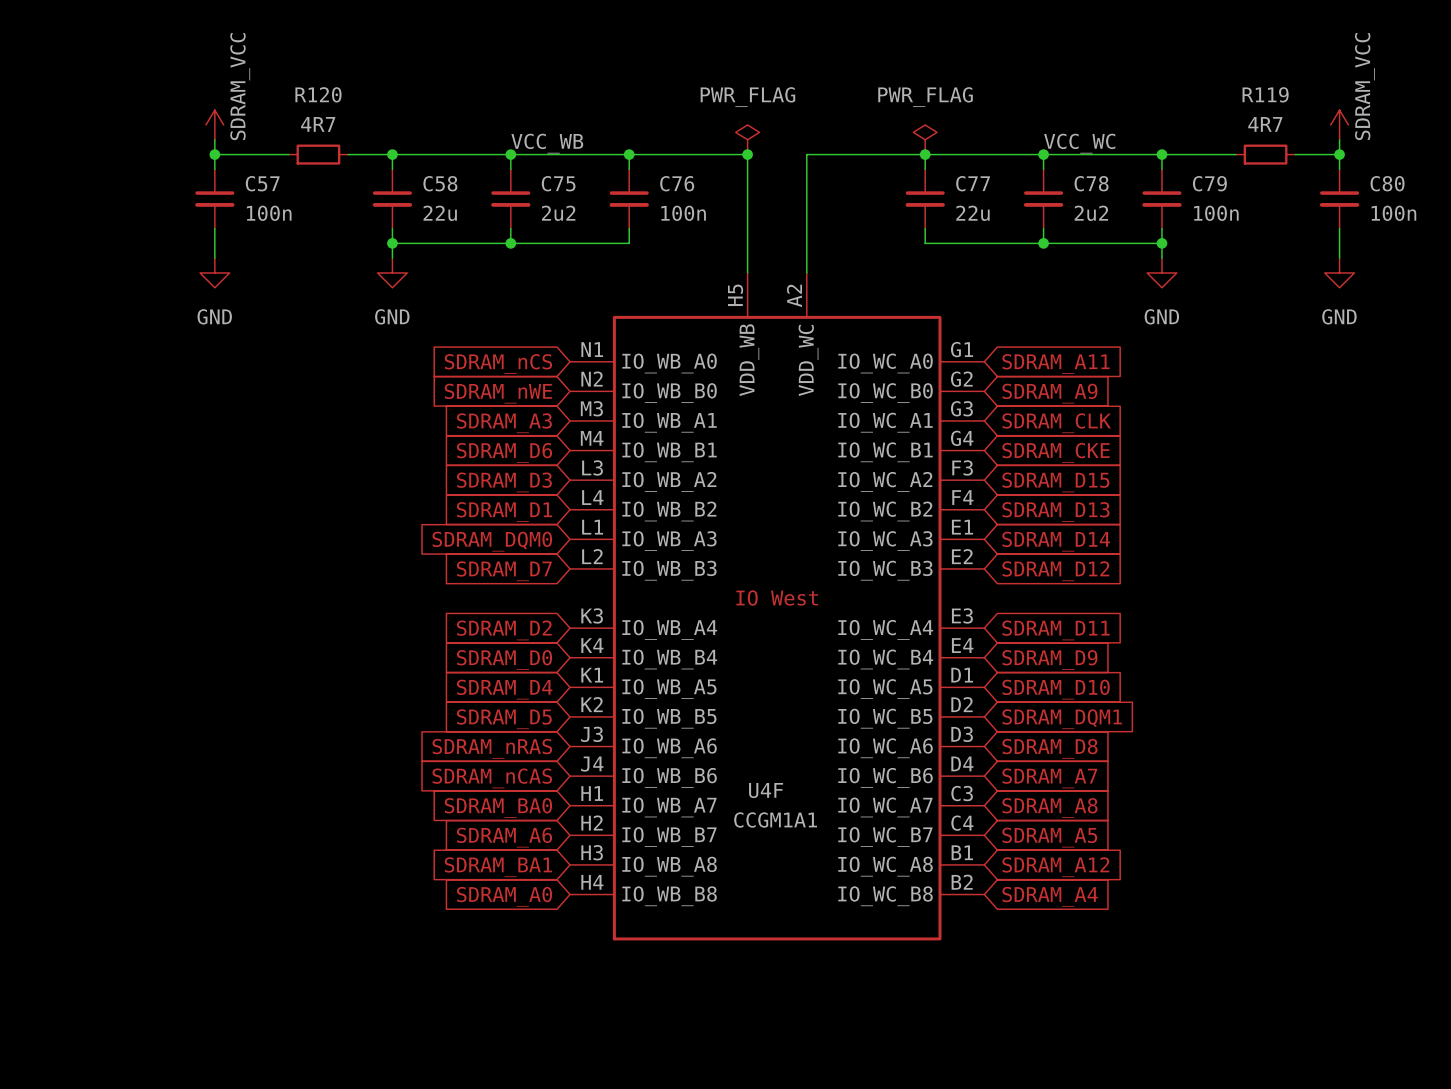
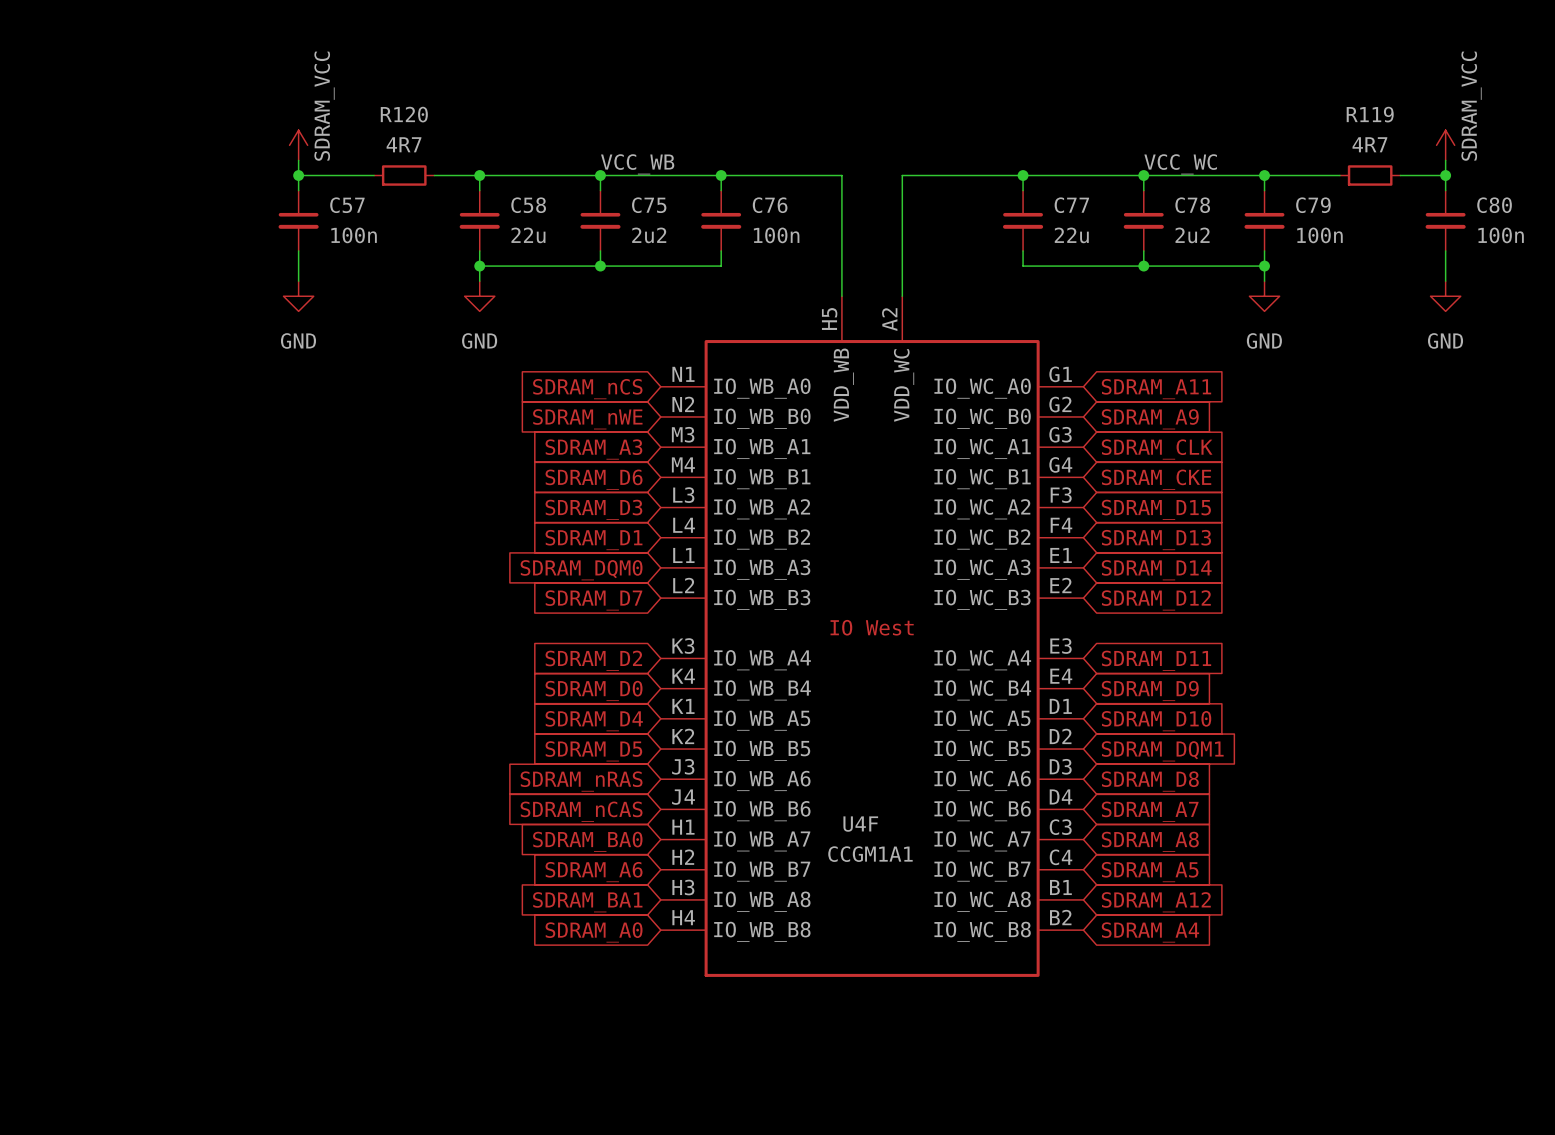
power symbol: PWR_FLAG (747, 139) -> none
power symbol: PWR_FLAG (925, 139) -> none
junction: (747, 154) -> none

